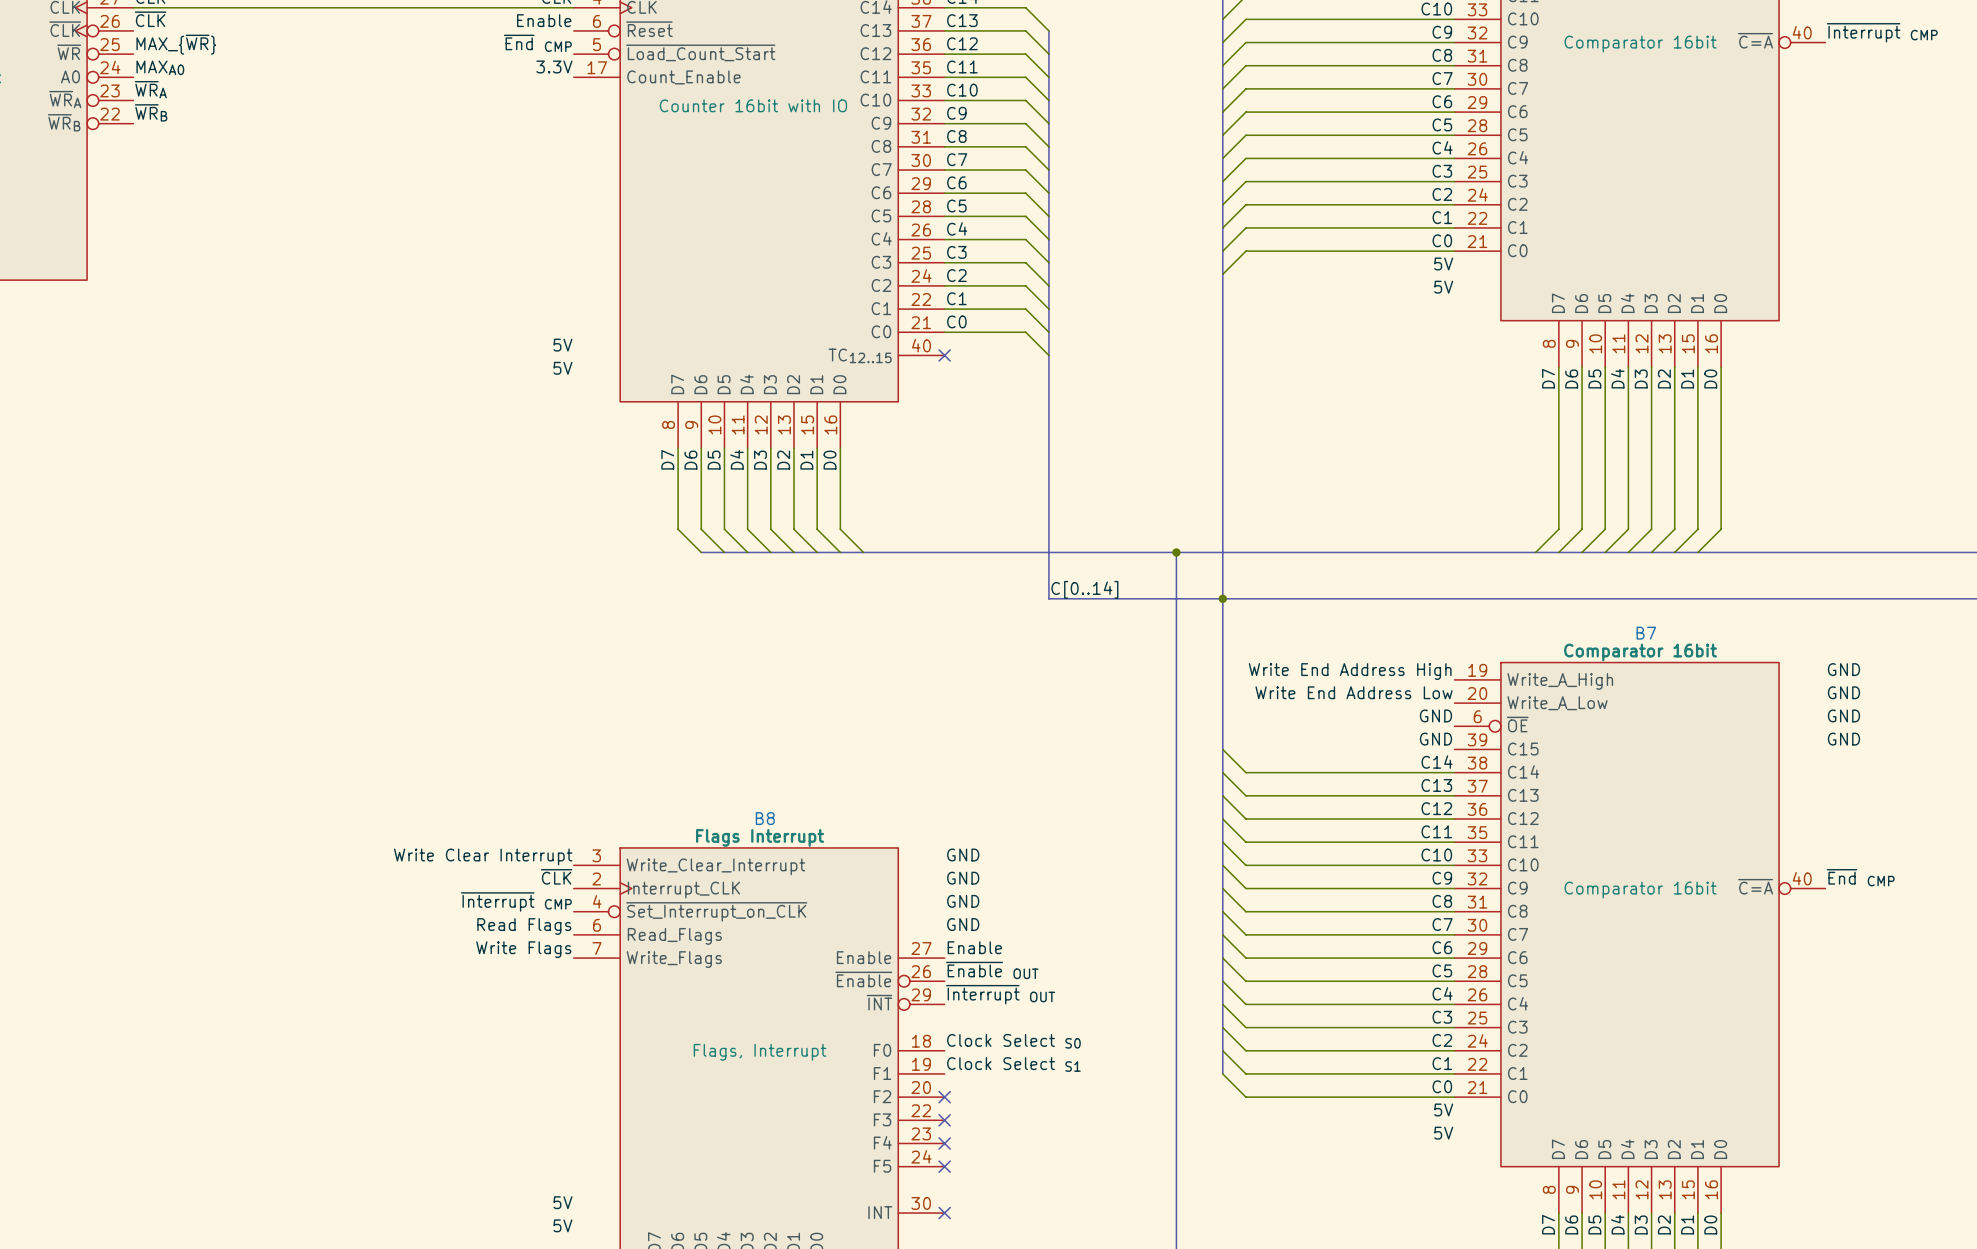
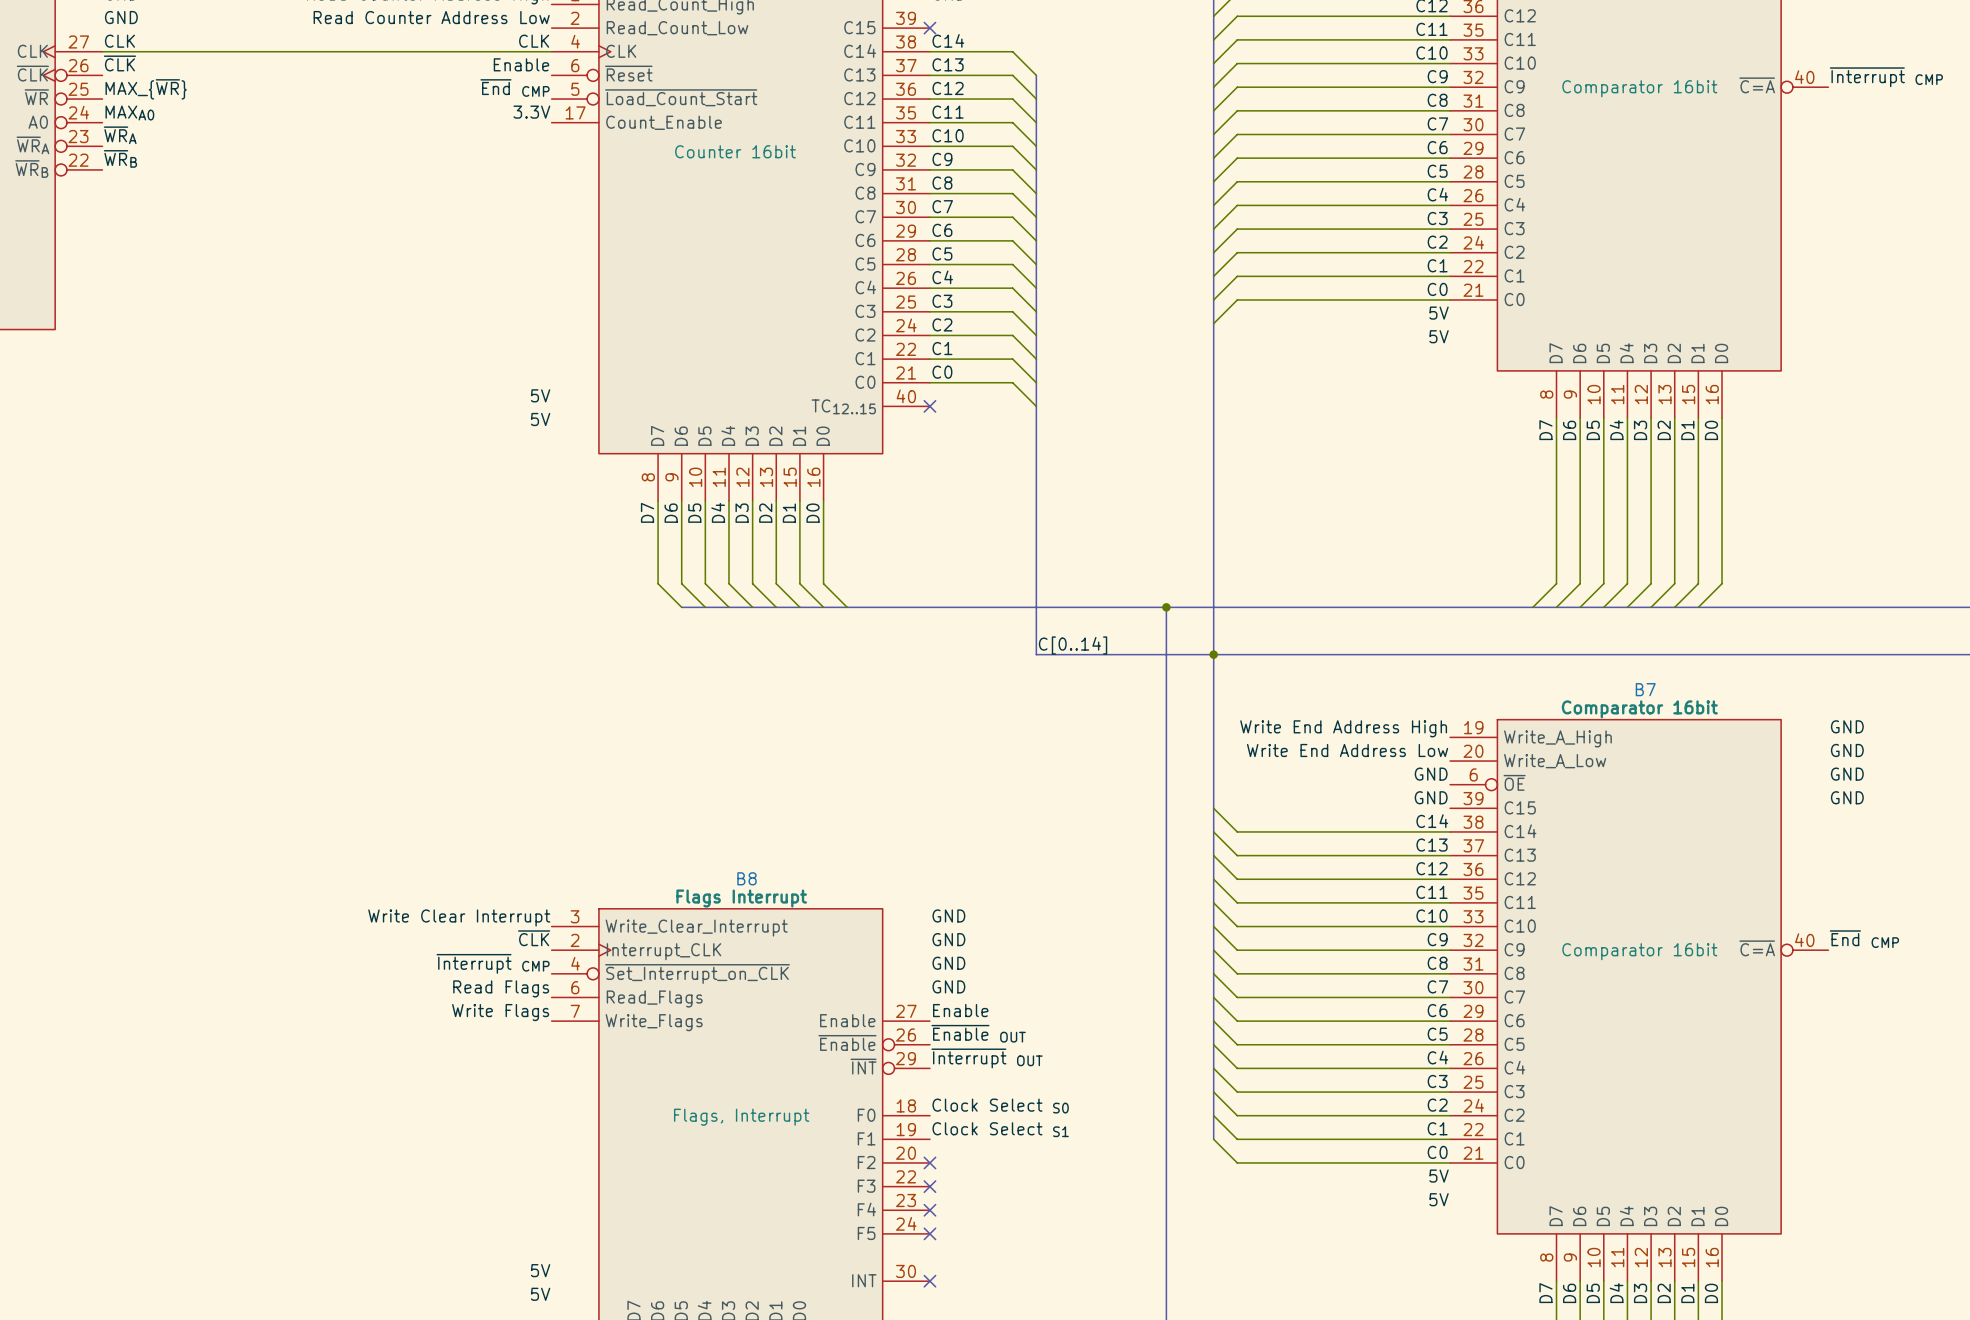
part text: Counter 16bit with IO (753, 105) -> Counter 16bit (735, 151)

